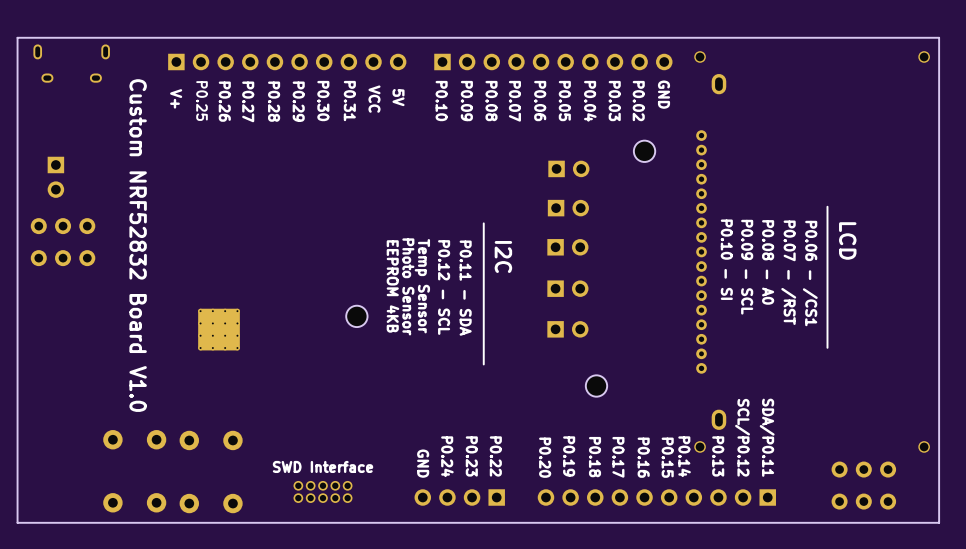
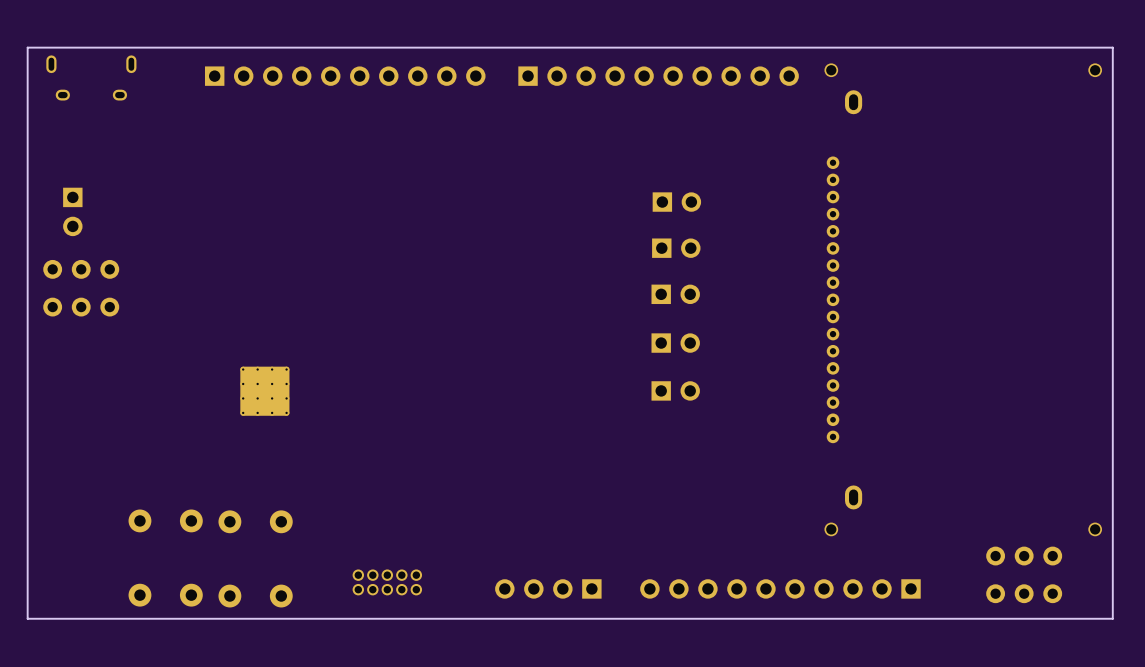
text: GND (664, 94) -> none
text: 5V (398, 97) -> none
text: V+ (176, 98) -> none
text: VCC (374, 99) -> none
text: P0.25 (202, 101) -> none
text: P0.26 (224, 101) -> none
text: P0.27 (248, 101) -> none
text: P0.28 (274, 101) -> none
text: P0.29 (298, 101) -> none
text: P0.30 (323, 101) -> none
text: P0.31 (349, 101) -> none
text: P0.10 (441, 101) -> none
text: P0.09 (466, 101) -> none
text: P0.08 (491, 101) -> none
text: P0.07 (514, 101) -> none
text: P0.06 (540, 101) -> none
text: P0.05 (564, 101) -> none
text: P0.04 (590, 101) -> none
text: P0.03 (614, 101) -> none
text: P0.02 (638, 101) -> none
part: (644, 151) -> none
line: (827, 206) (827, 347) -> none
line: (483, 223) (483, 364) -> none
text: LCD (847, 240) -> none
text: Custom NRF52832 Board V1.0 (138, 245) -> none
text: I2C (503, 256) -> none
text: P0.10 - SI (726, 259) -> none
text: P0.08 - A0 (768, 262) -> none
text: P0.09 - SCL (747, 267) -> none
text: P0.07 - /RST (788, 272) -> none
text: P0.06 - /CS1 (810, 273) -> none
text: EEPROM 4KB (392, 286) -> none
text: Photo Sensor (408, 286) -> none
text: Temp Sensor (422, 286) -> none
text: P0.12 - SCL (444, 287) -> none
text: P0.11 - SDA (465, 288) -> none
part: (356, 316) -> none
part: (596, 386) -> none
text: SCL/P0.12 (742, 437) -> none
text: SDA/P0.11 (767, 437) -> none
text: P0.24 (447, 456) -> none
text: P0.23 (471, 456) -> none
text: P0.22 (495, 456) -> none
text: P0.19 (569, 456) -> none
text: P0.14 (684, 456) -> none
text: P0.13 (718, 456) -> none
text: P0.20 (545, 457) -> none
text: P0.18 (595, 457) -> none
text: P0.17 (618, 457) -> none
text: P0.16 (643, 457) -> none
text: P0.15 (667, 457) -> none
text: GND (423, 463) -> none
text: SWD Interface (322, 466) -> none

